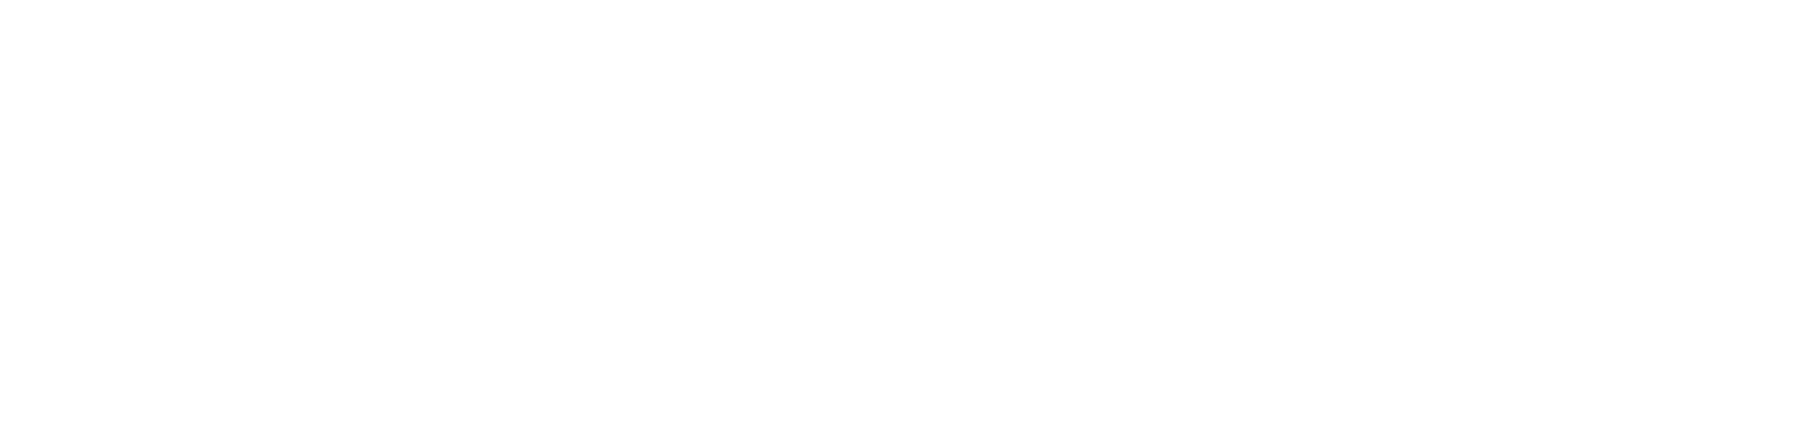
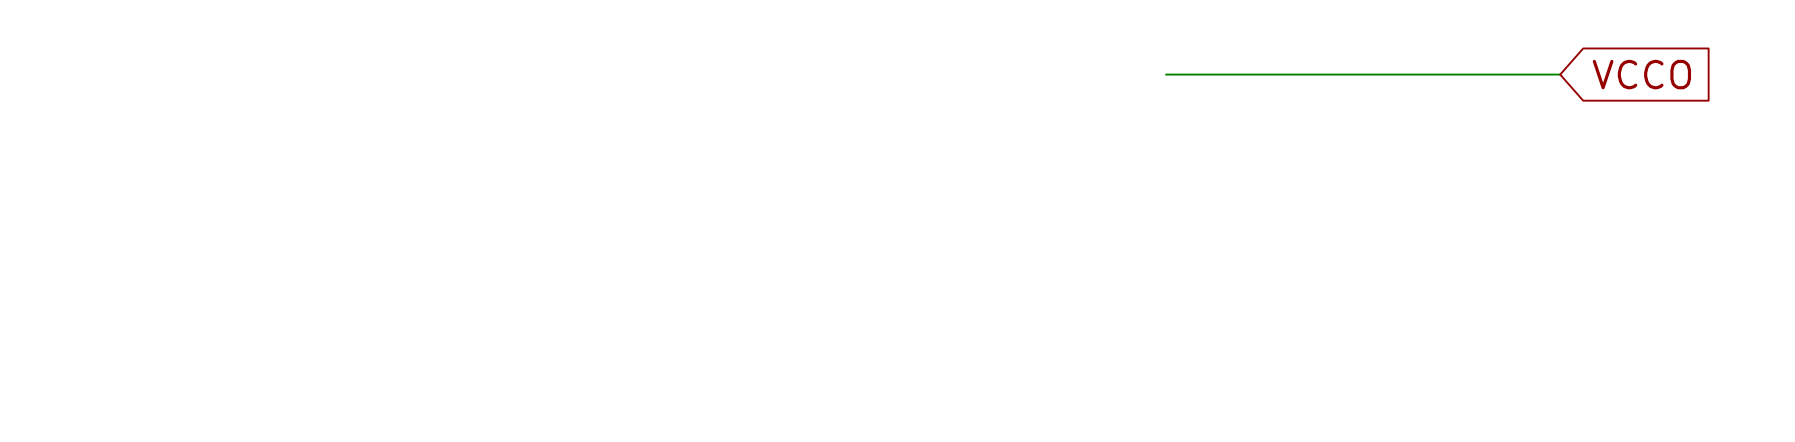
wire: none -> (1165, 74) (1560, 74)
global label: none -> VCCO (1641, 74)

